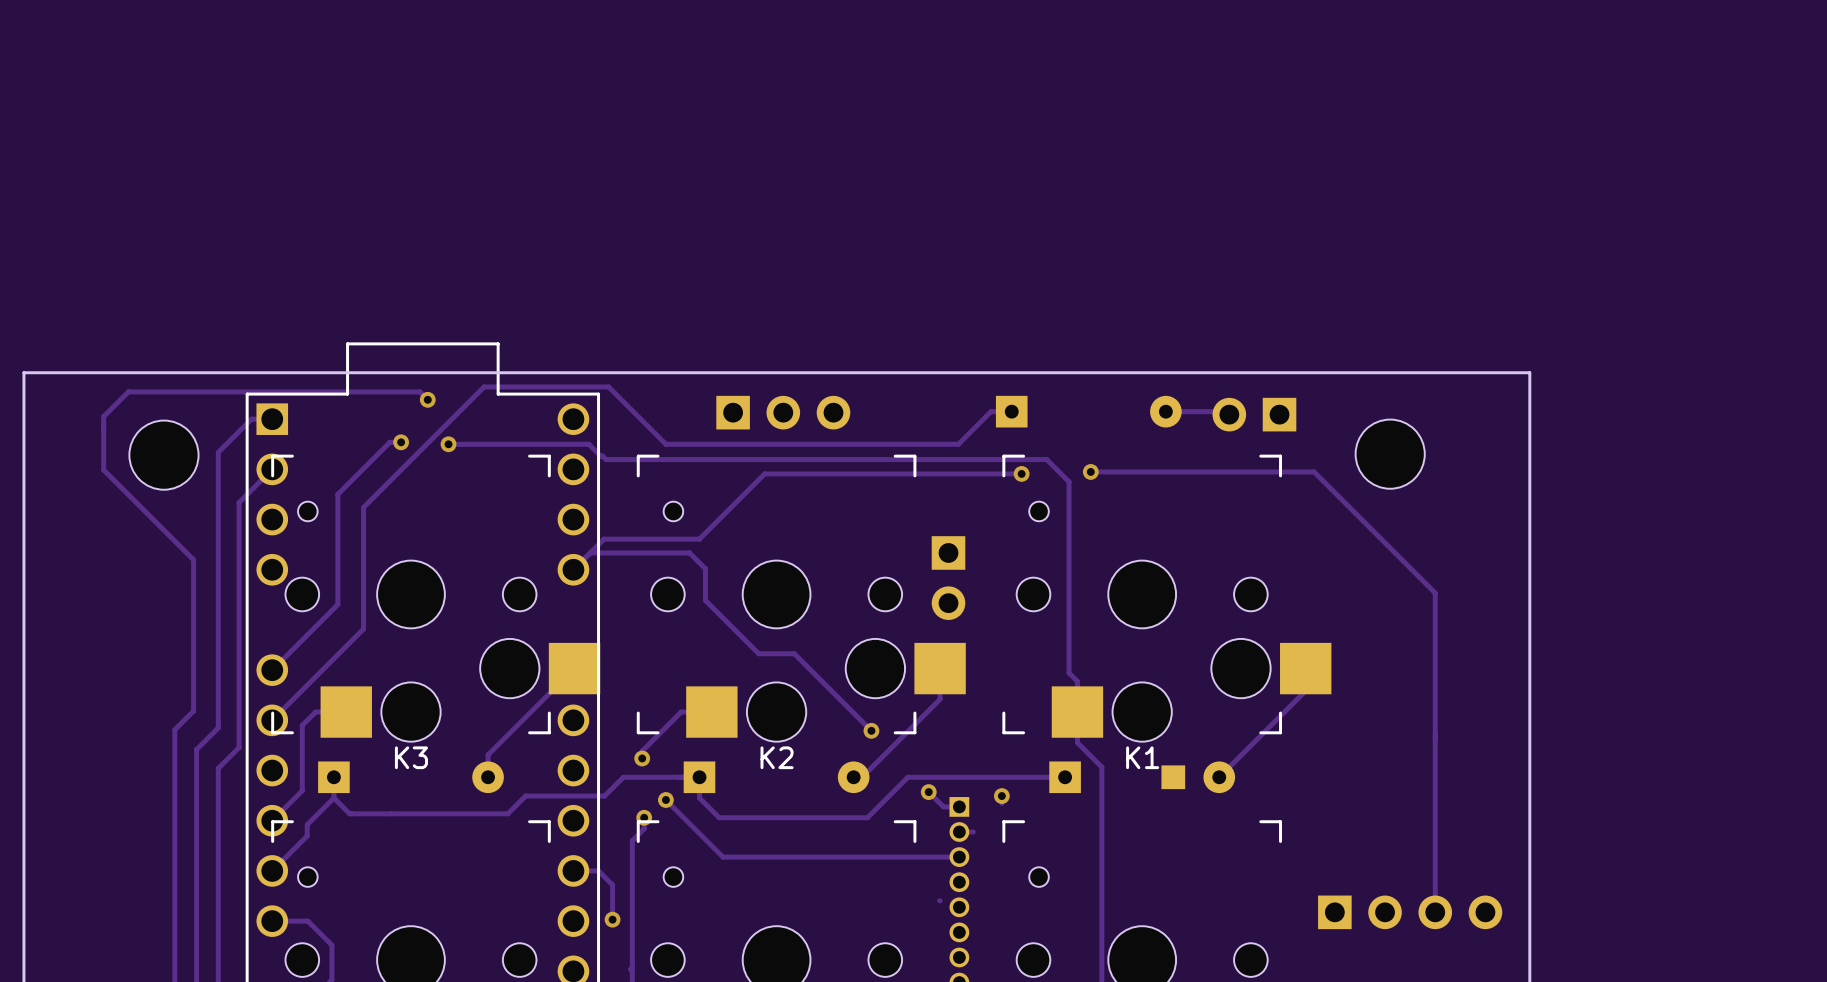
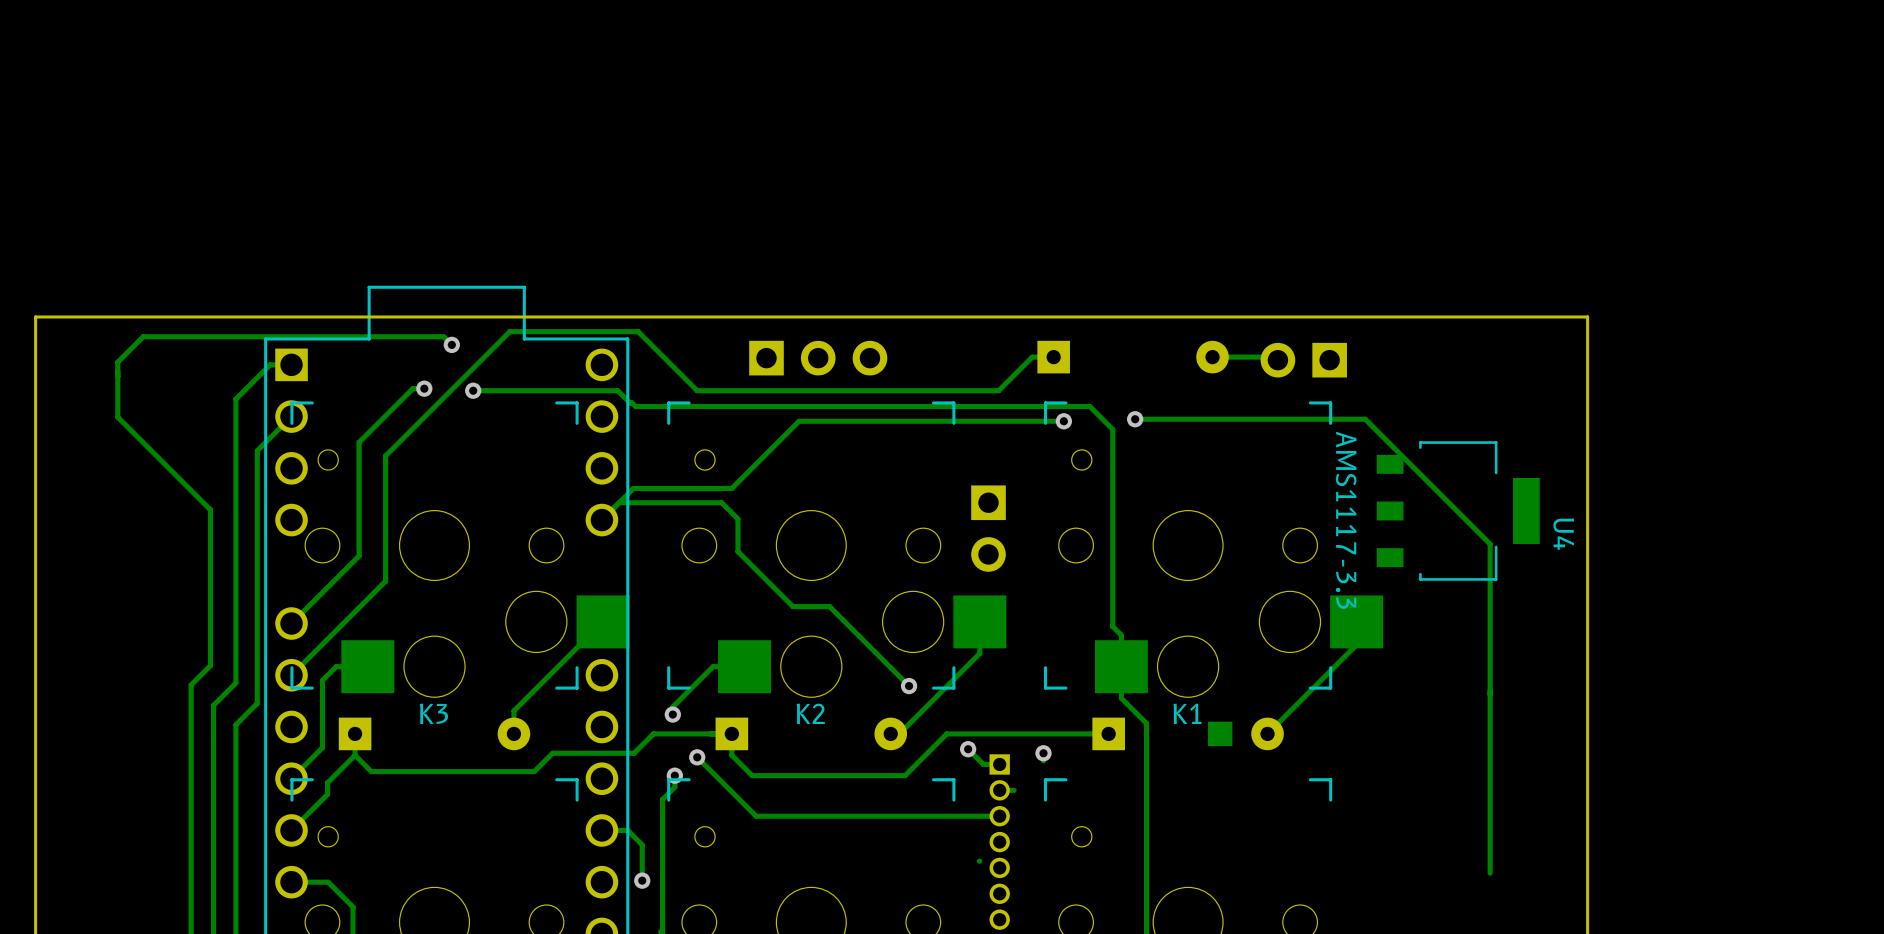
part: (1390, 454) -> none
part: (163, 455) -> none
U4: none -> AMS1117-3.3 (1458, 510)
part: (1410, 912) -> none

